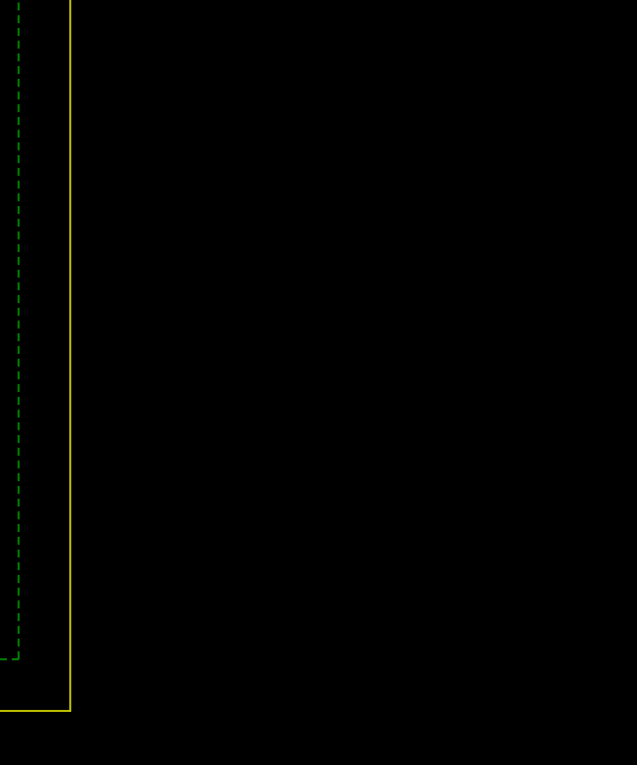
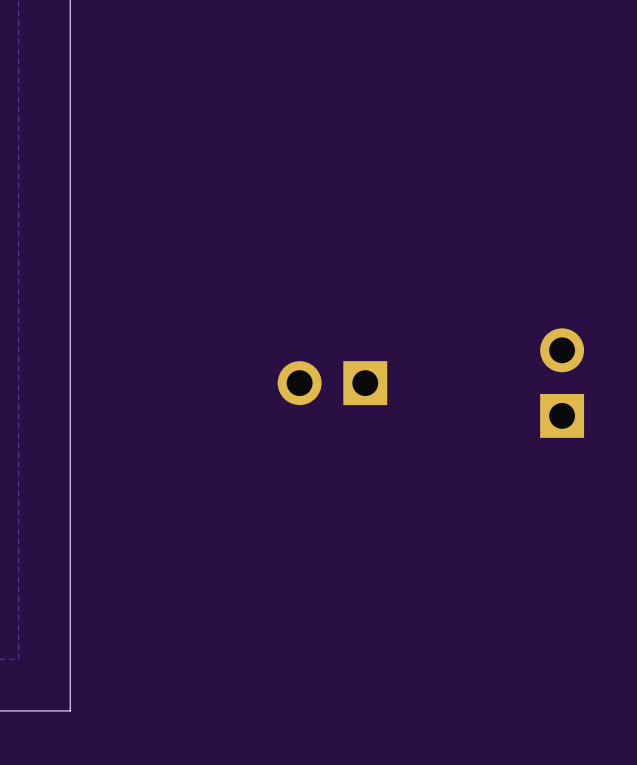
part: none -> (332, 383)
part: none -> (562, 383)

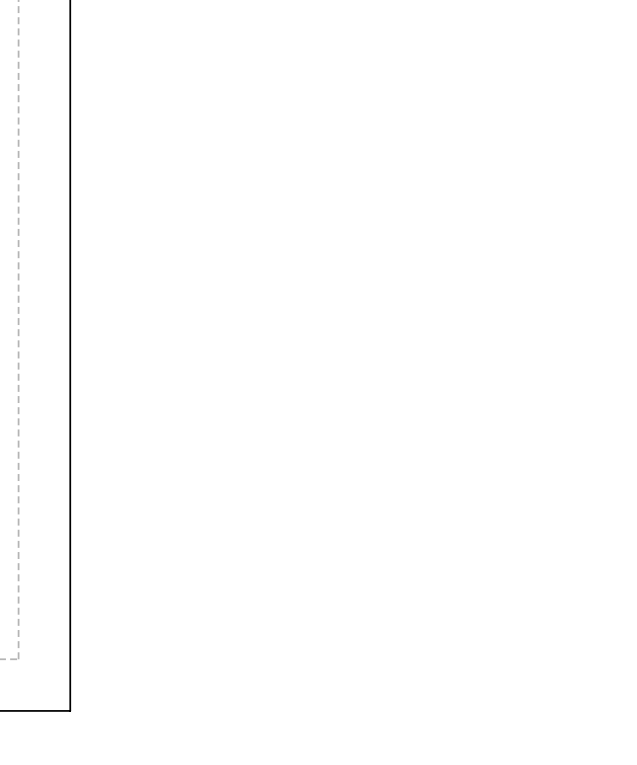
part: (332, 383) -> none
part: (562, 383) -> none

